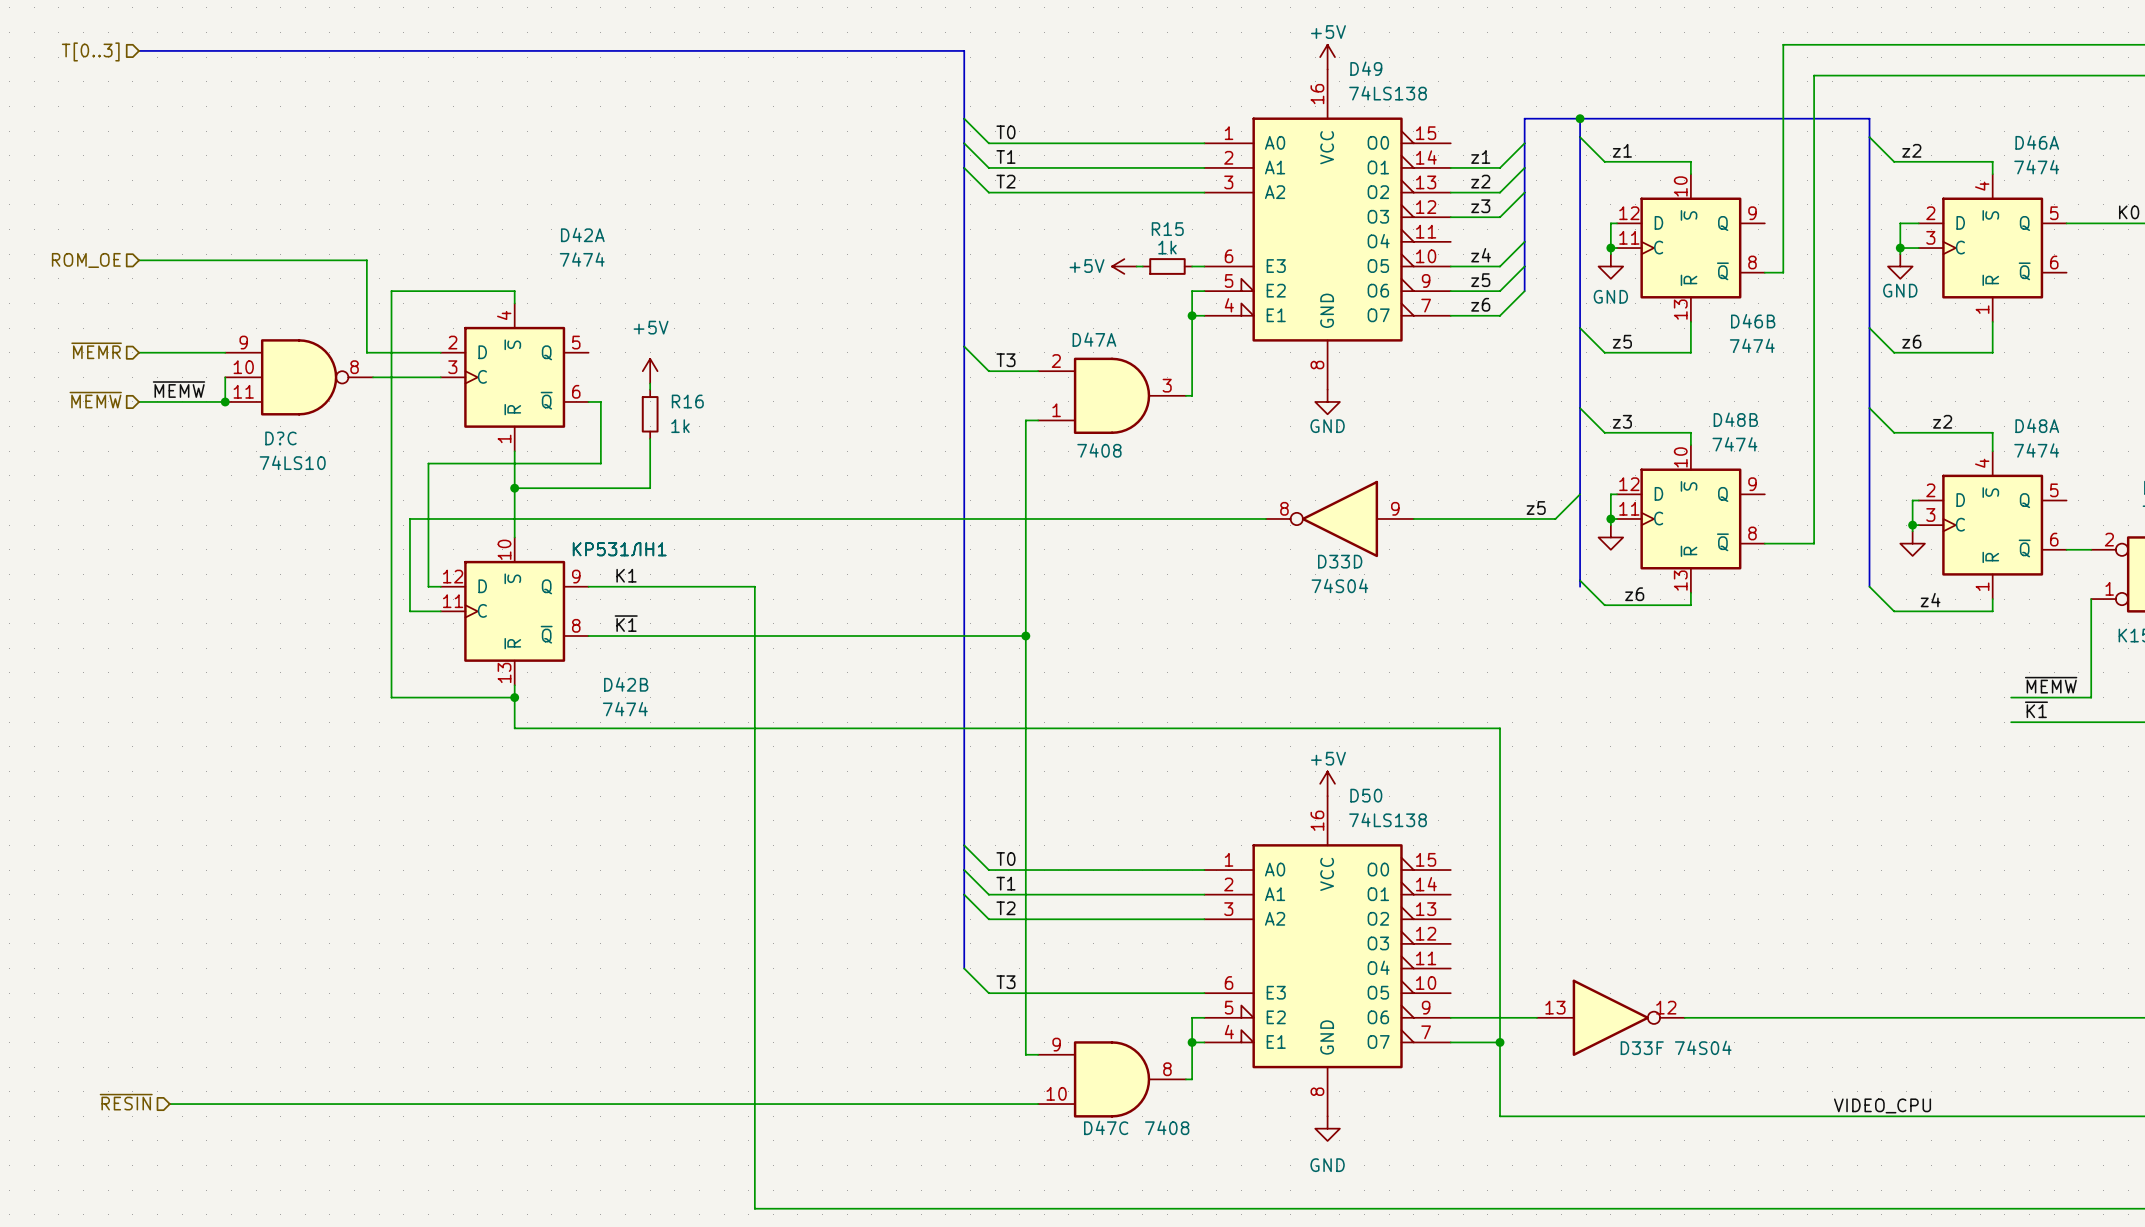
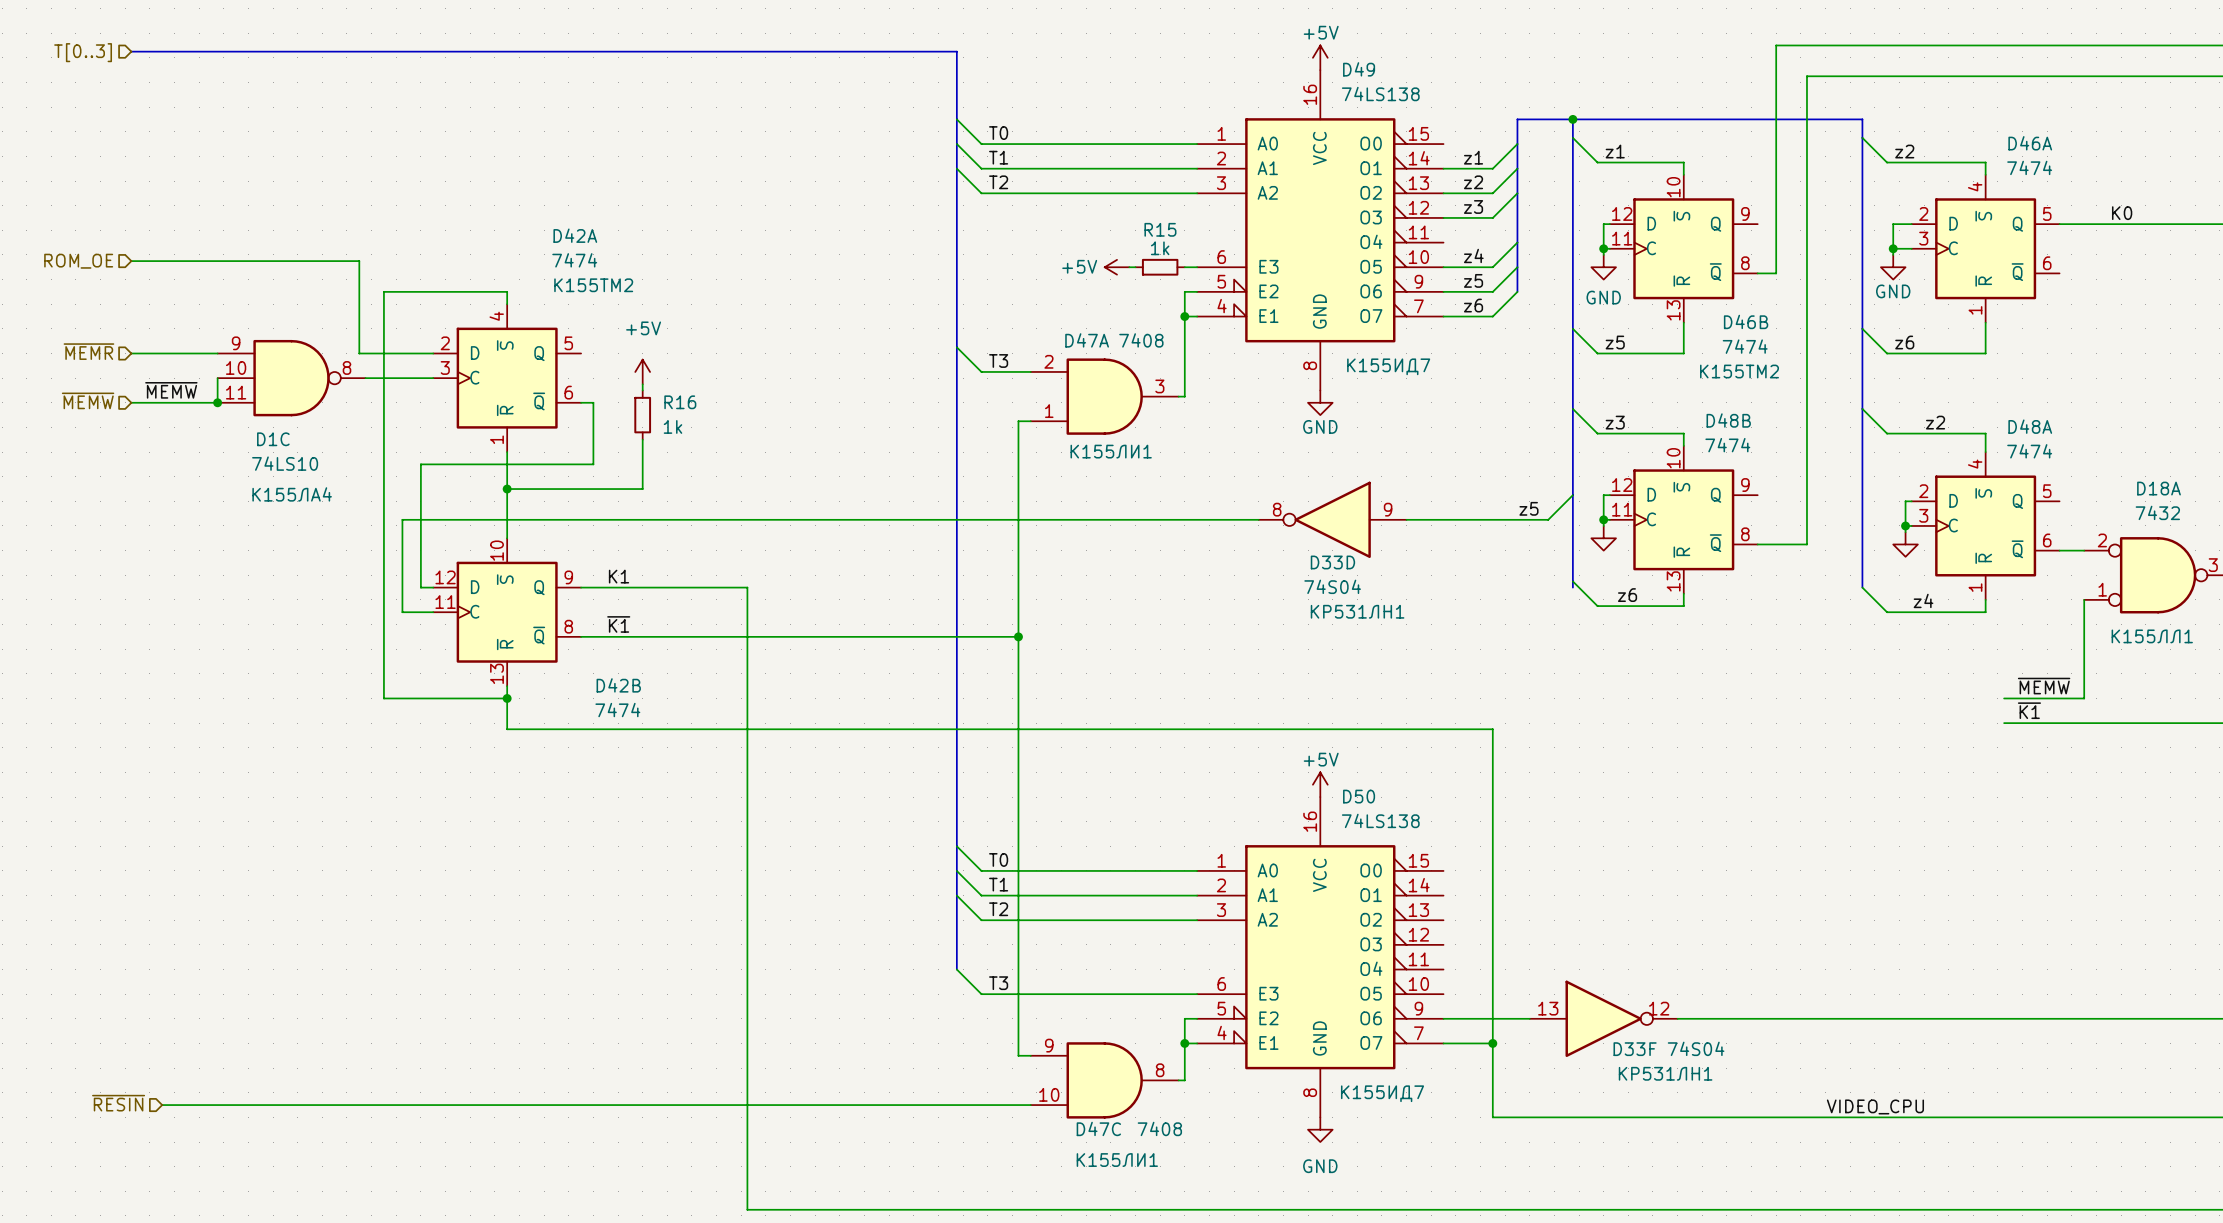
D42A text: none -> К155ТМ2 (593, 285)
D49 text: none -> К155ИД7 (1388, 366)
D46B text: none -> К155ТМ2 (1739, 371)
D?C name: D?C (280, 438) -> D1C (273, 439)
D47A value position: 7408 (1099, 450) -> 7408 (1141, 340)
D47A text: none -> К155ЛИ1 (1111, 451)
D?C text: none -> К155ЛА4 (292, 494)
D33D text position: КР531ЛН1 (619, 549) -> КР531ЛН1 (1357, 611)
D33F text position: КР531ЛН1 (619, 549) -> КР531ЛН1 (1665, 1073)
D50 text: none -> К155ИД7 (1382, 1093)
D47C text: none -> К155ЛИ1 (1117, 1160)

